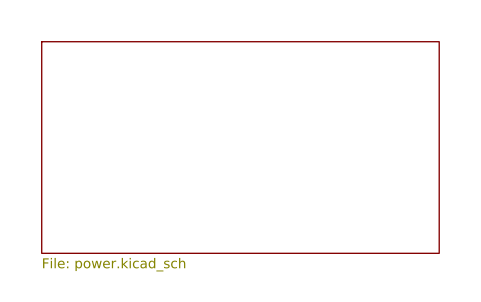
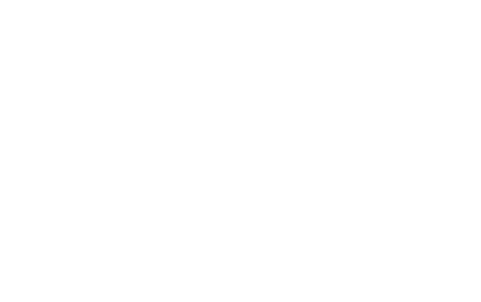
sheet: File: power.kicad_sch (240, 147) -> none

